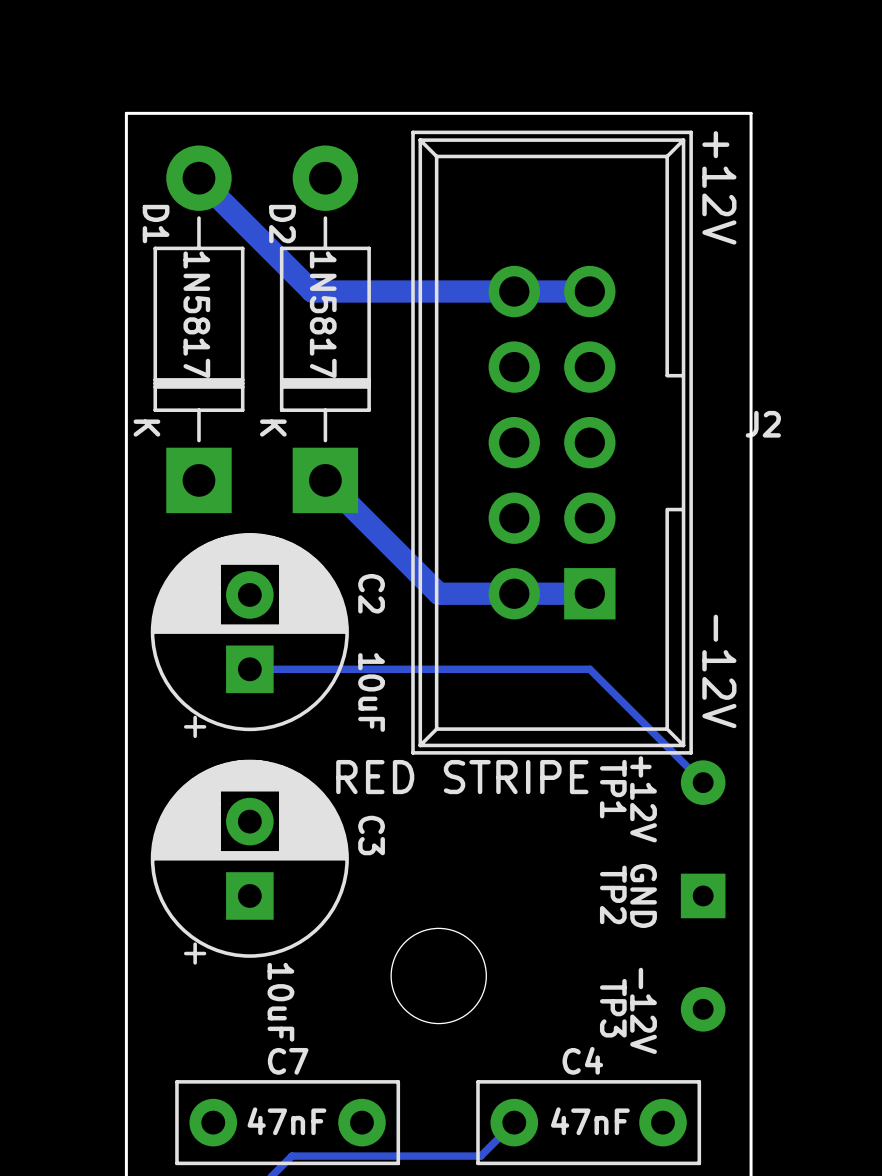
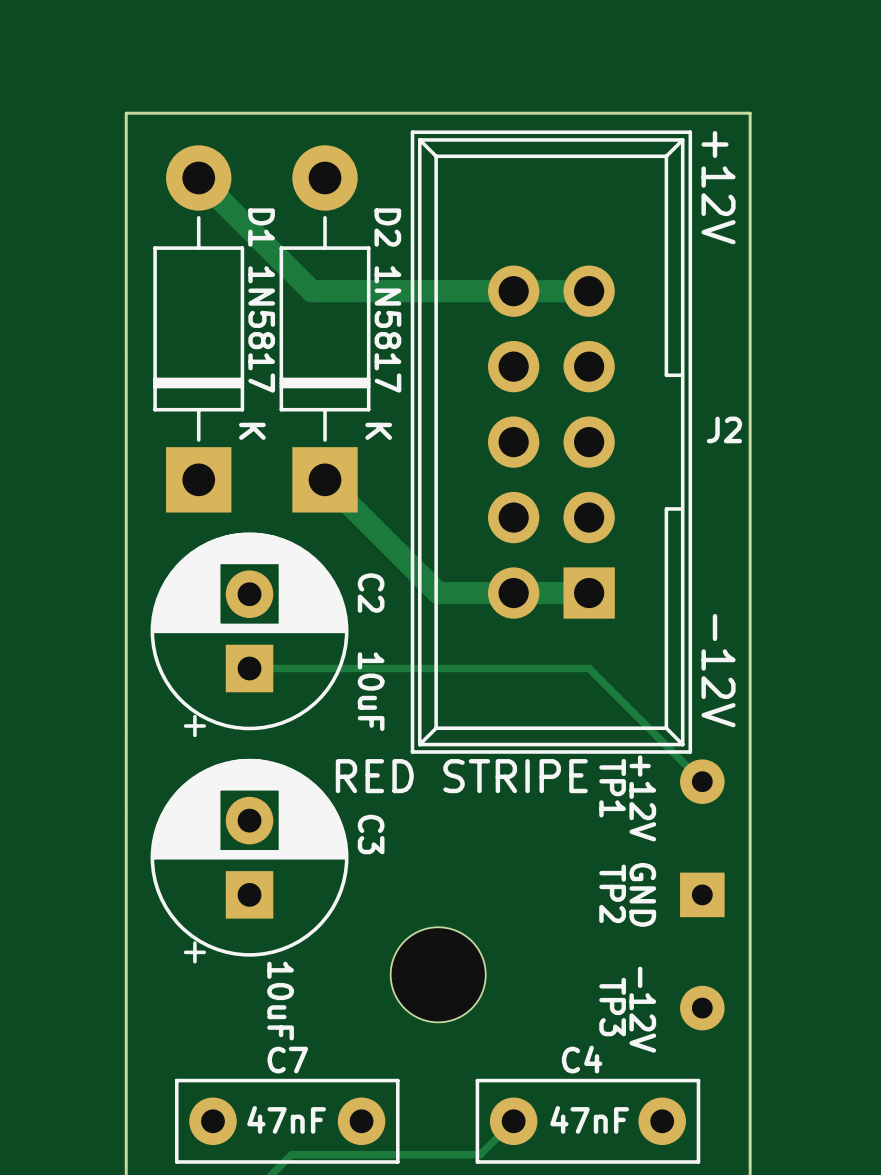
D1 name position: D1 (156, 224) -> D1 (261, 227)
D2 name position: D2 (282, 224) -> D2 (387, 227)
D1 value position: 1N5817 (196, 314) -> 1N5817 (261, 329)
D2 value position: 1N5817 (323, 314) -> 1N5817 (387, 329)
J2 name position: J2 (763, 424) -> J2 (724, 429)
D1 text position: K (146, 428) -> K (252, 431)
D2 text position: K (273, 428) -> K (378, 431)

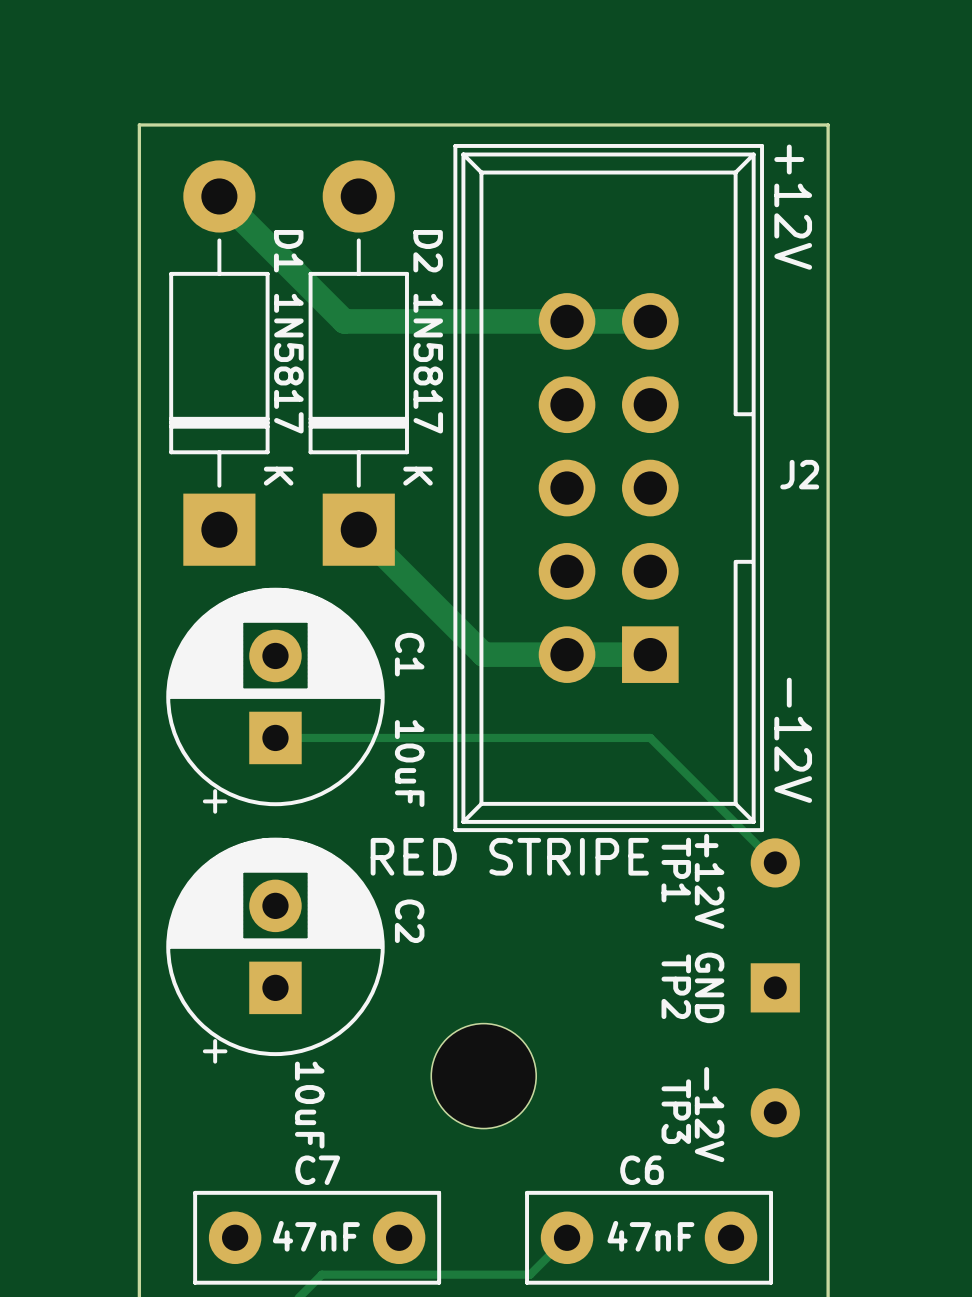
C2 name: C2 (371, 593) -> C1 (409, 654)
C3 name: C3 (371, 834) -> C2 (409, 921)
C4 name: C4 (582, 1059) -> C6 (642, 1170)

